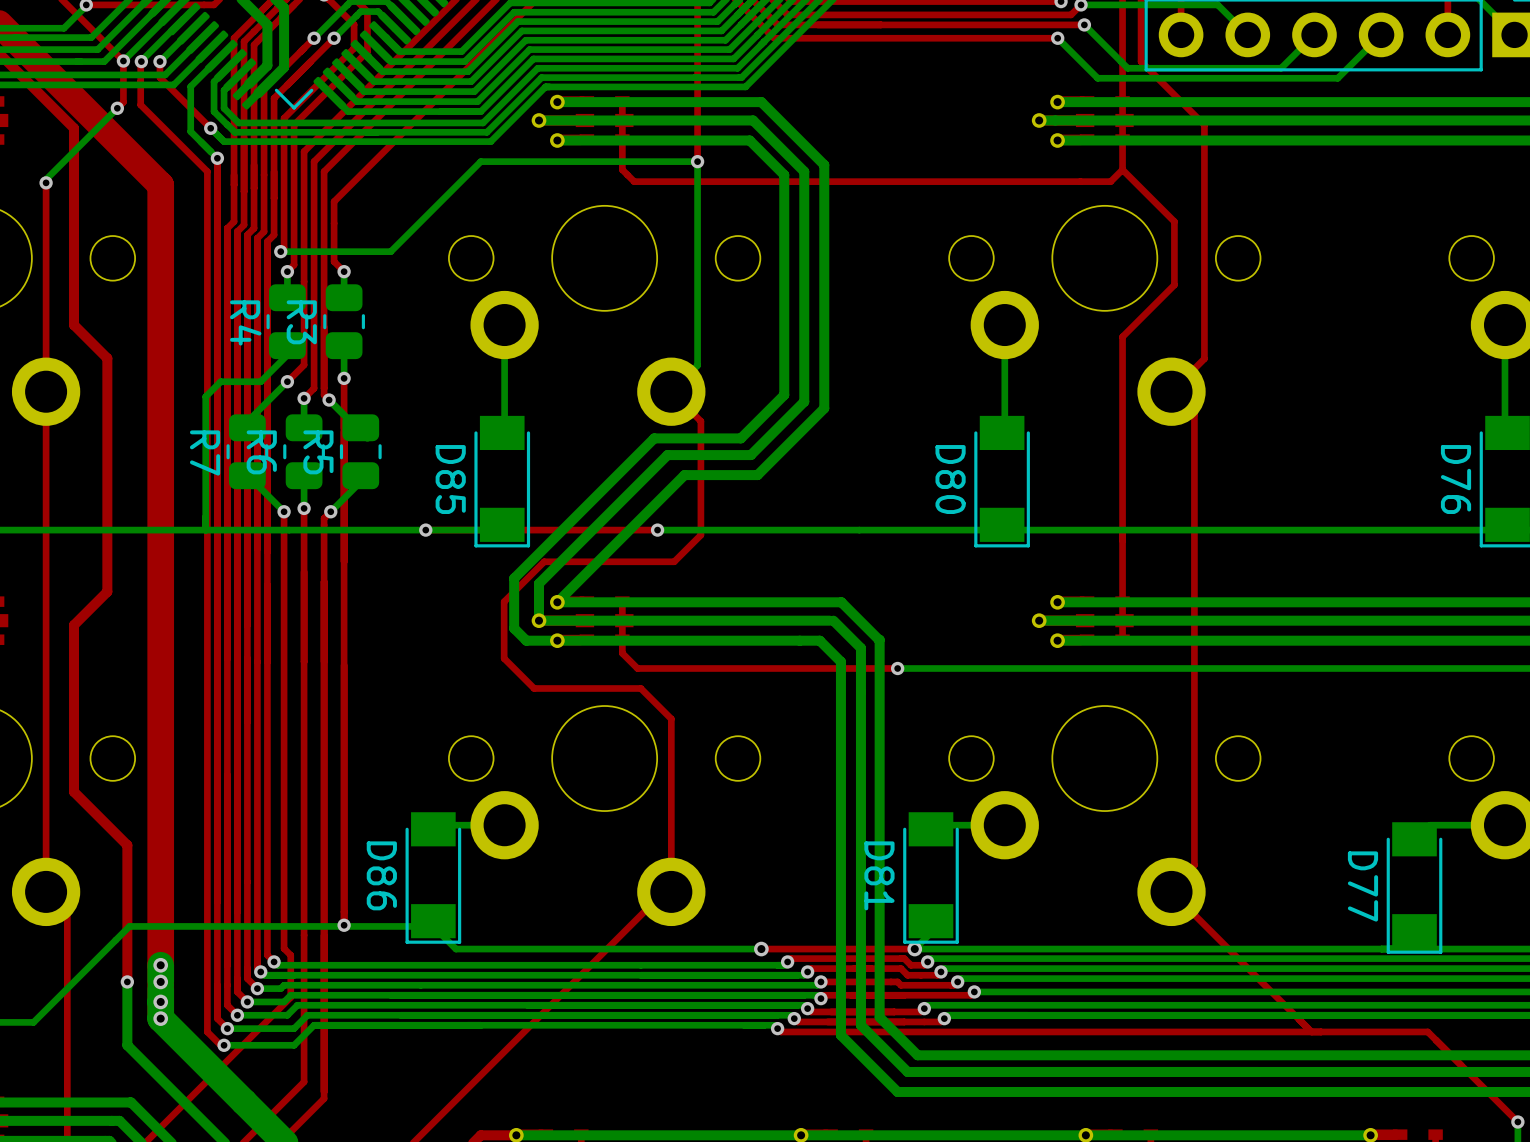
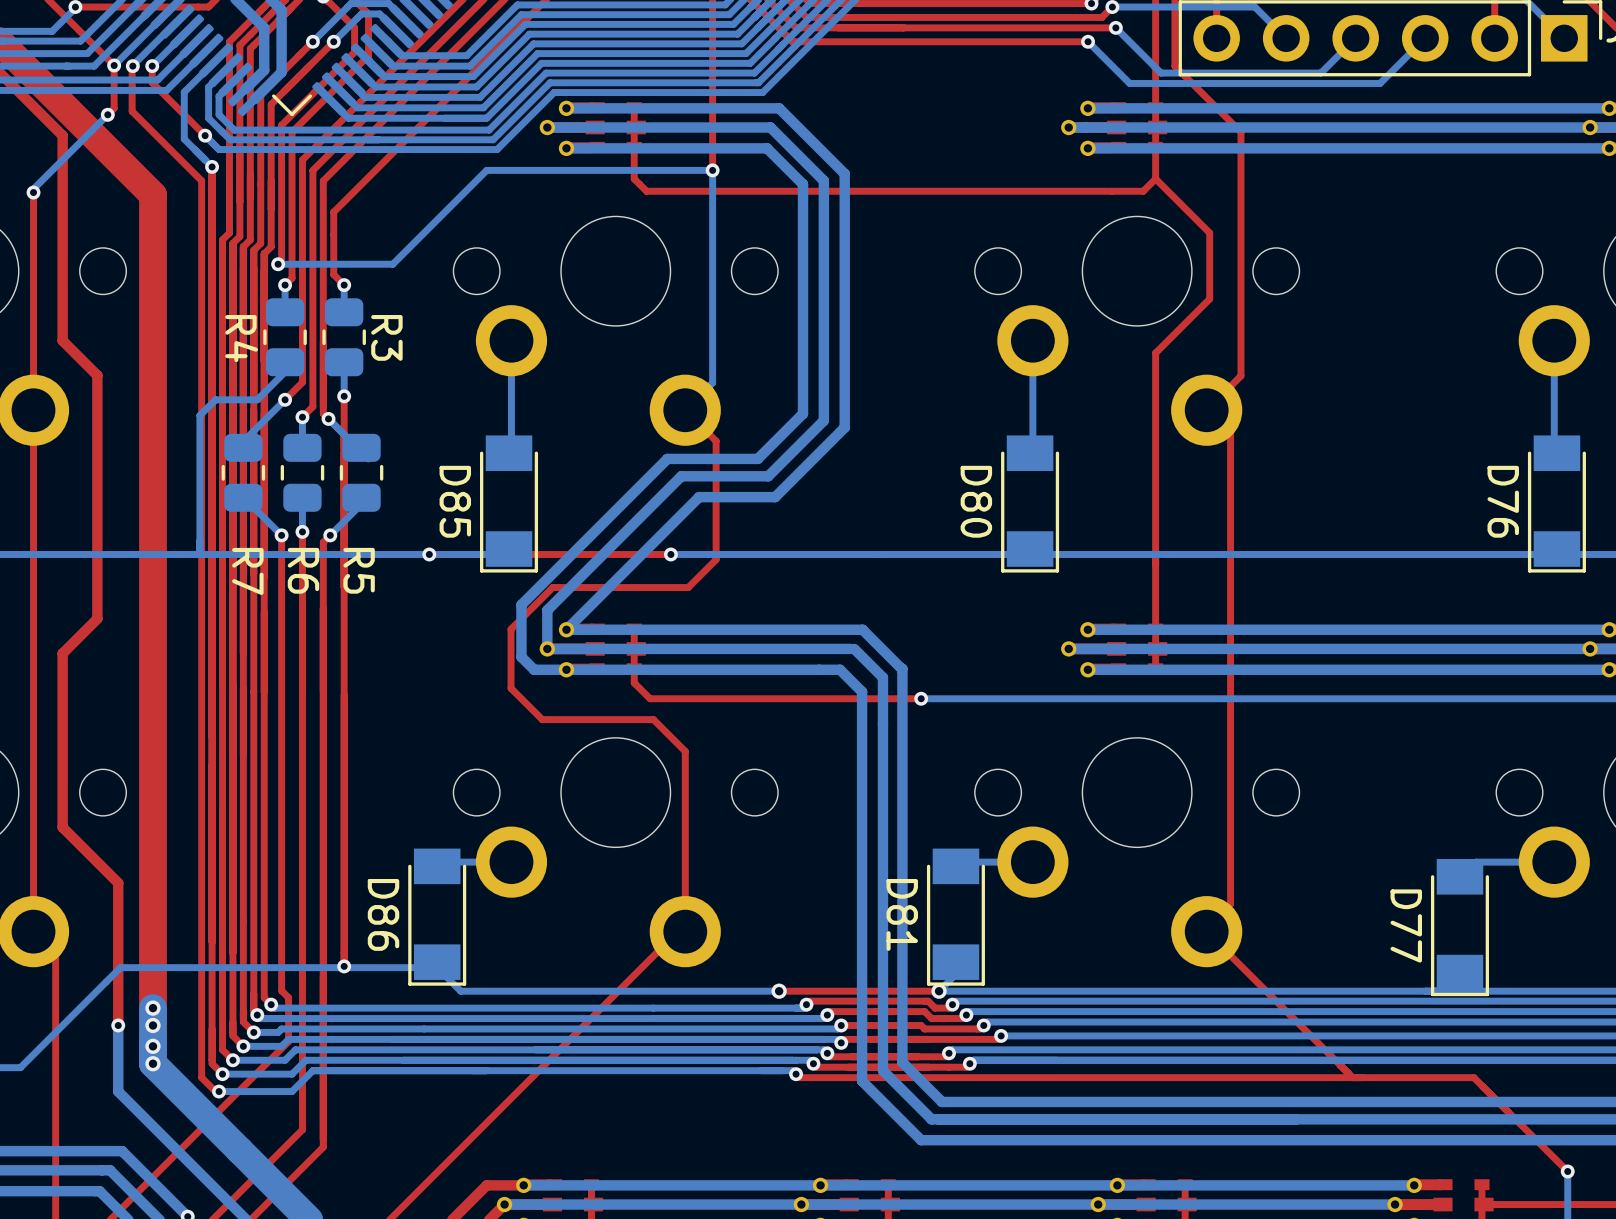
R3 name position: R3 (301, 322) -> R3 (386, 337)
R7 name position: R7 (205, 452) -> R7 (247, 571)
R6 name position: R6 (261, 452) -> R6 (303, 570)
R5 name position: R5 (318, 452) -> R5 (359, 570)

